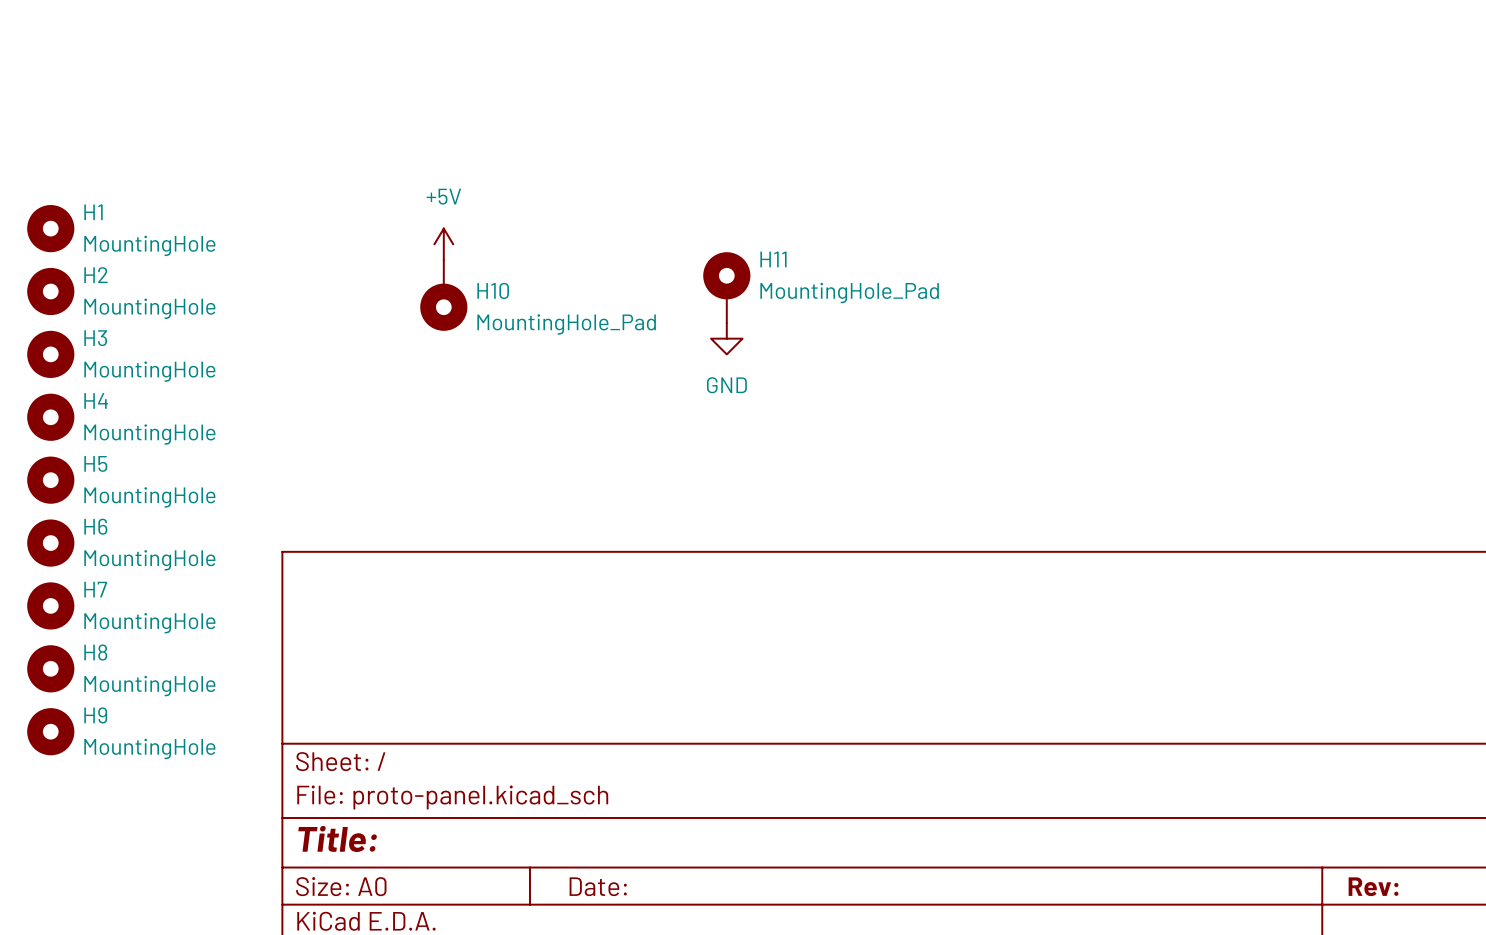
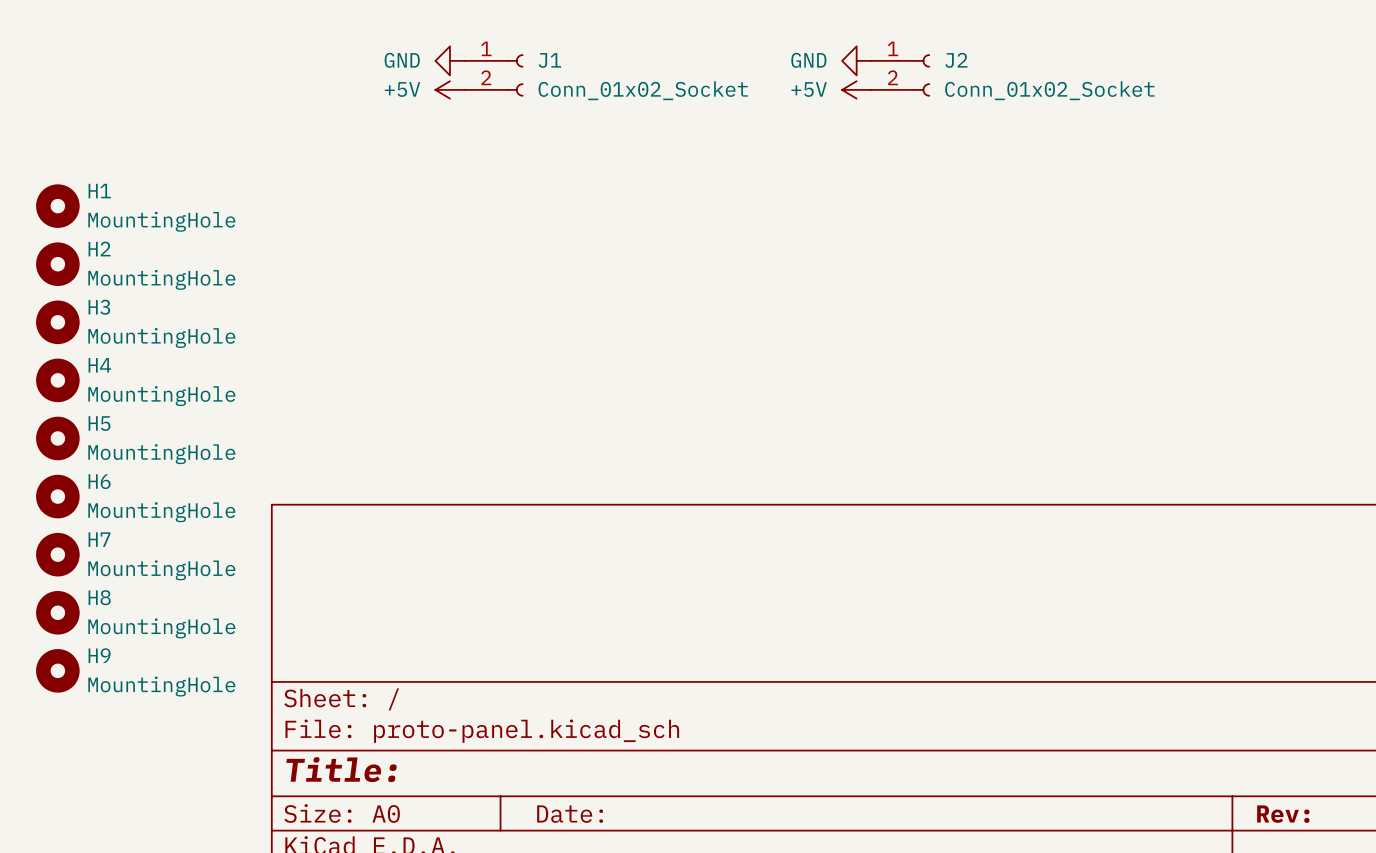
power symbol: none -> GND (449, 60)
power symbol: none -> GND (856, 60)
J1: none -> Conn_01x02_Socket (493, 75)
J2: none -> Conn_01x02_Socket (900, 75)
power symbol: none -> +5V (856, 89)
power symbol rotation: 0° (443, 244) -> 90° counterclockwise (449, 89)
power symbol position: +5V (443, 244) -> +5V (449, 89)
H11: MountingHole_Pad (726, 287) -> none
H10: MountingHole_Pad (443, 295) -> none
power symbol: GND (726, 338) -> none

